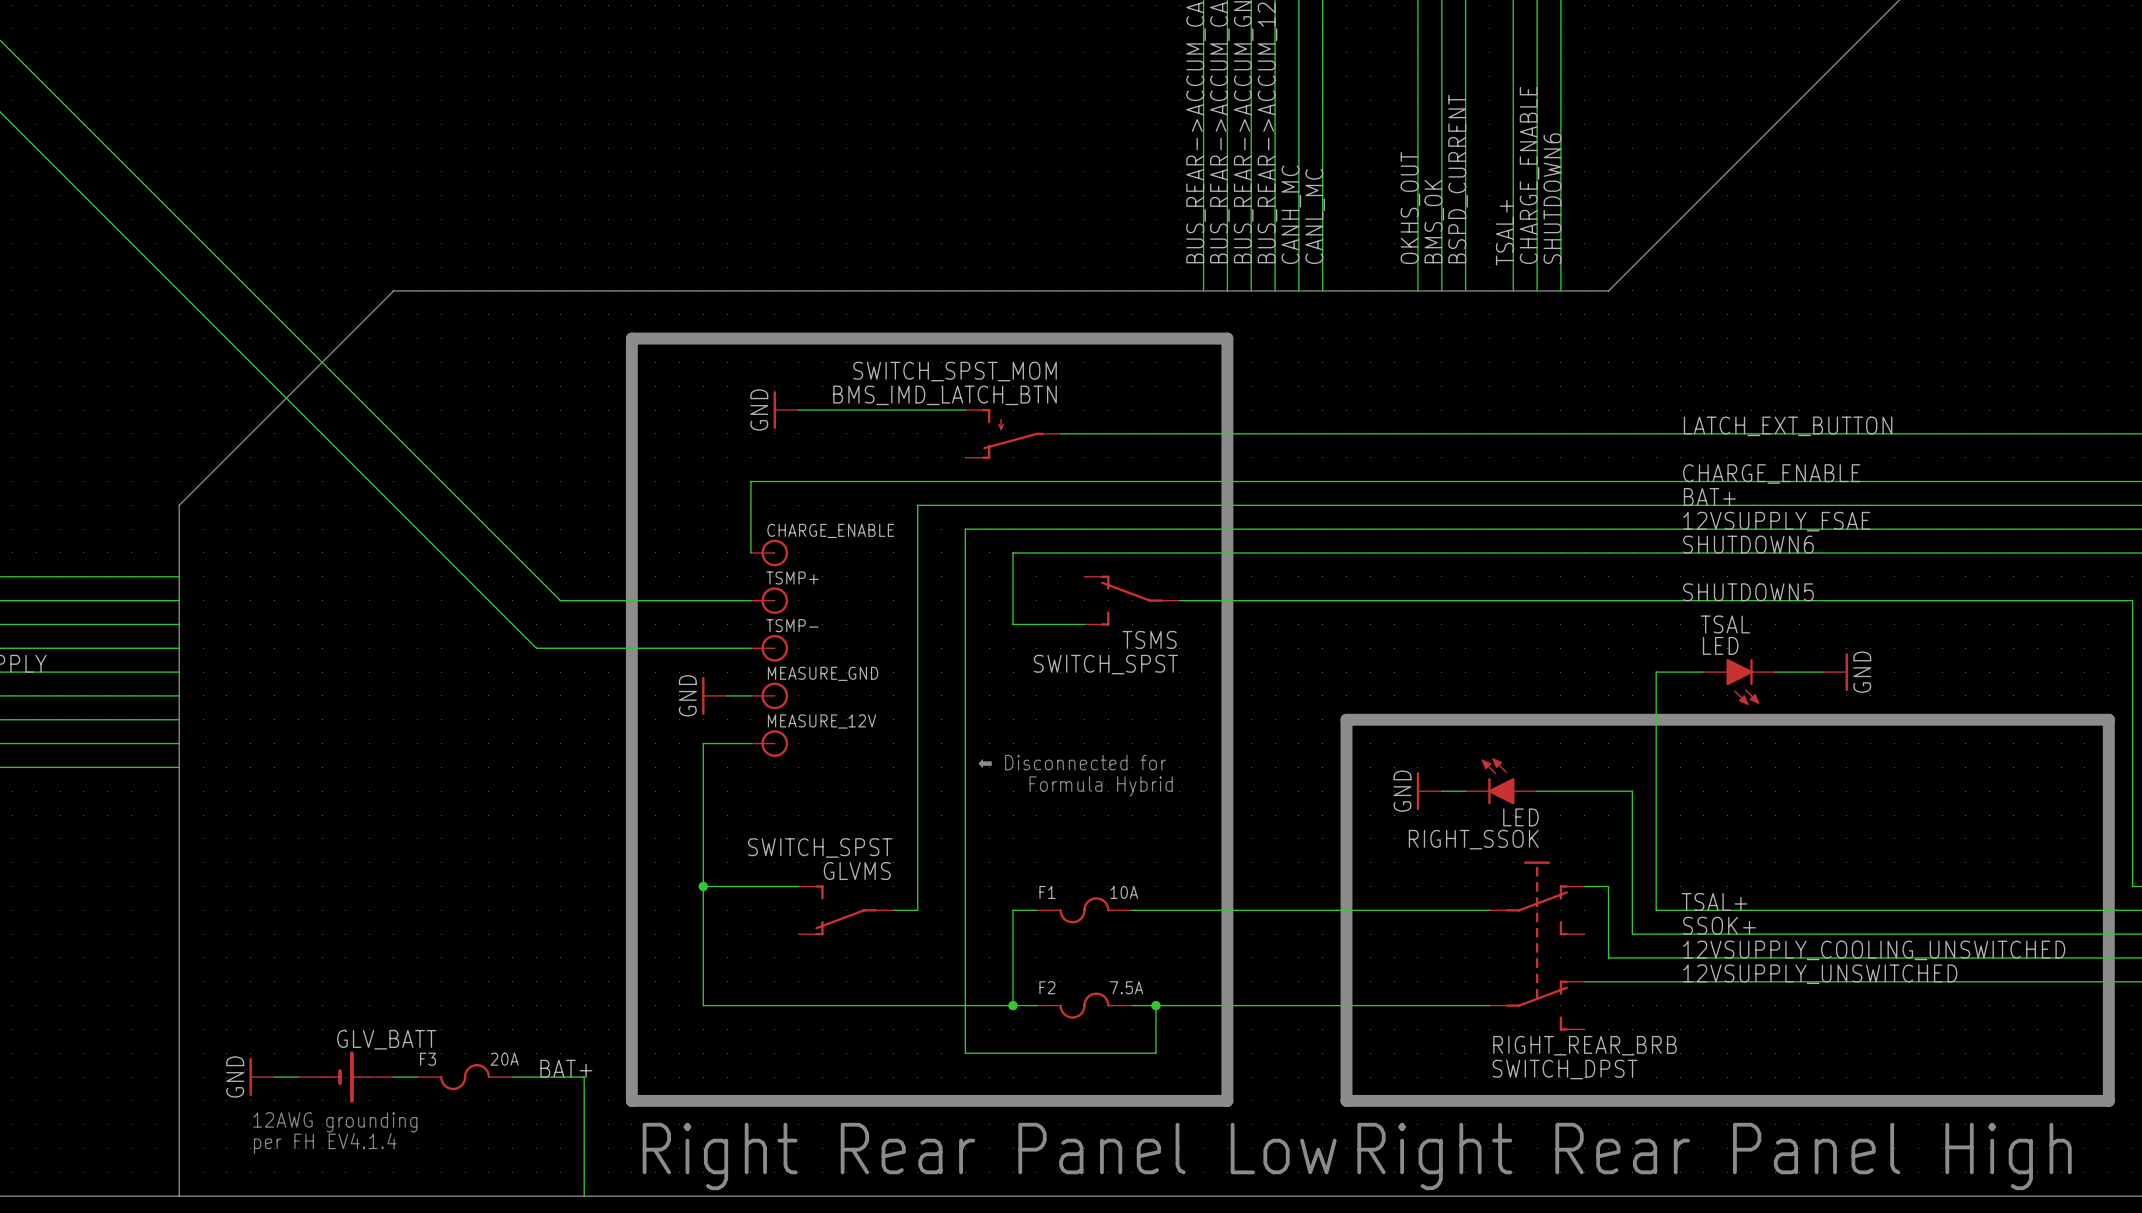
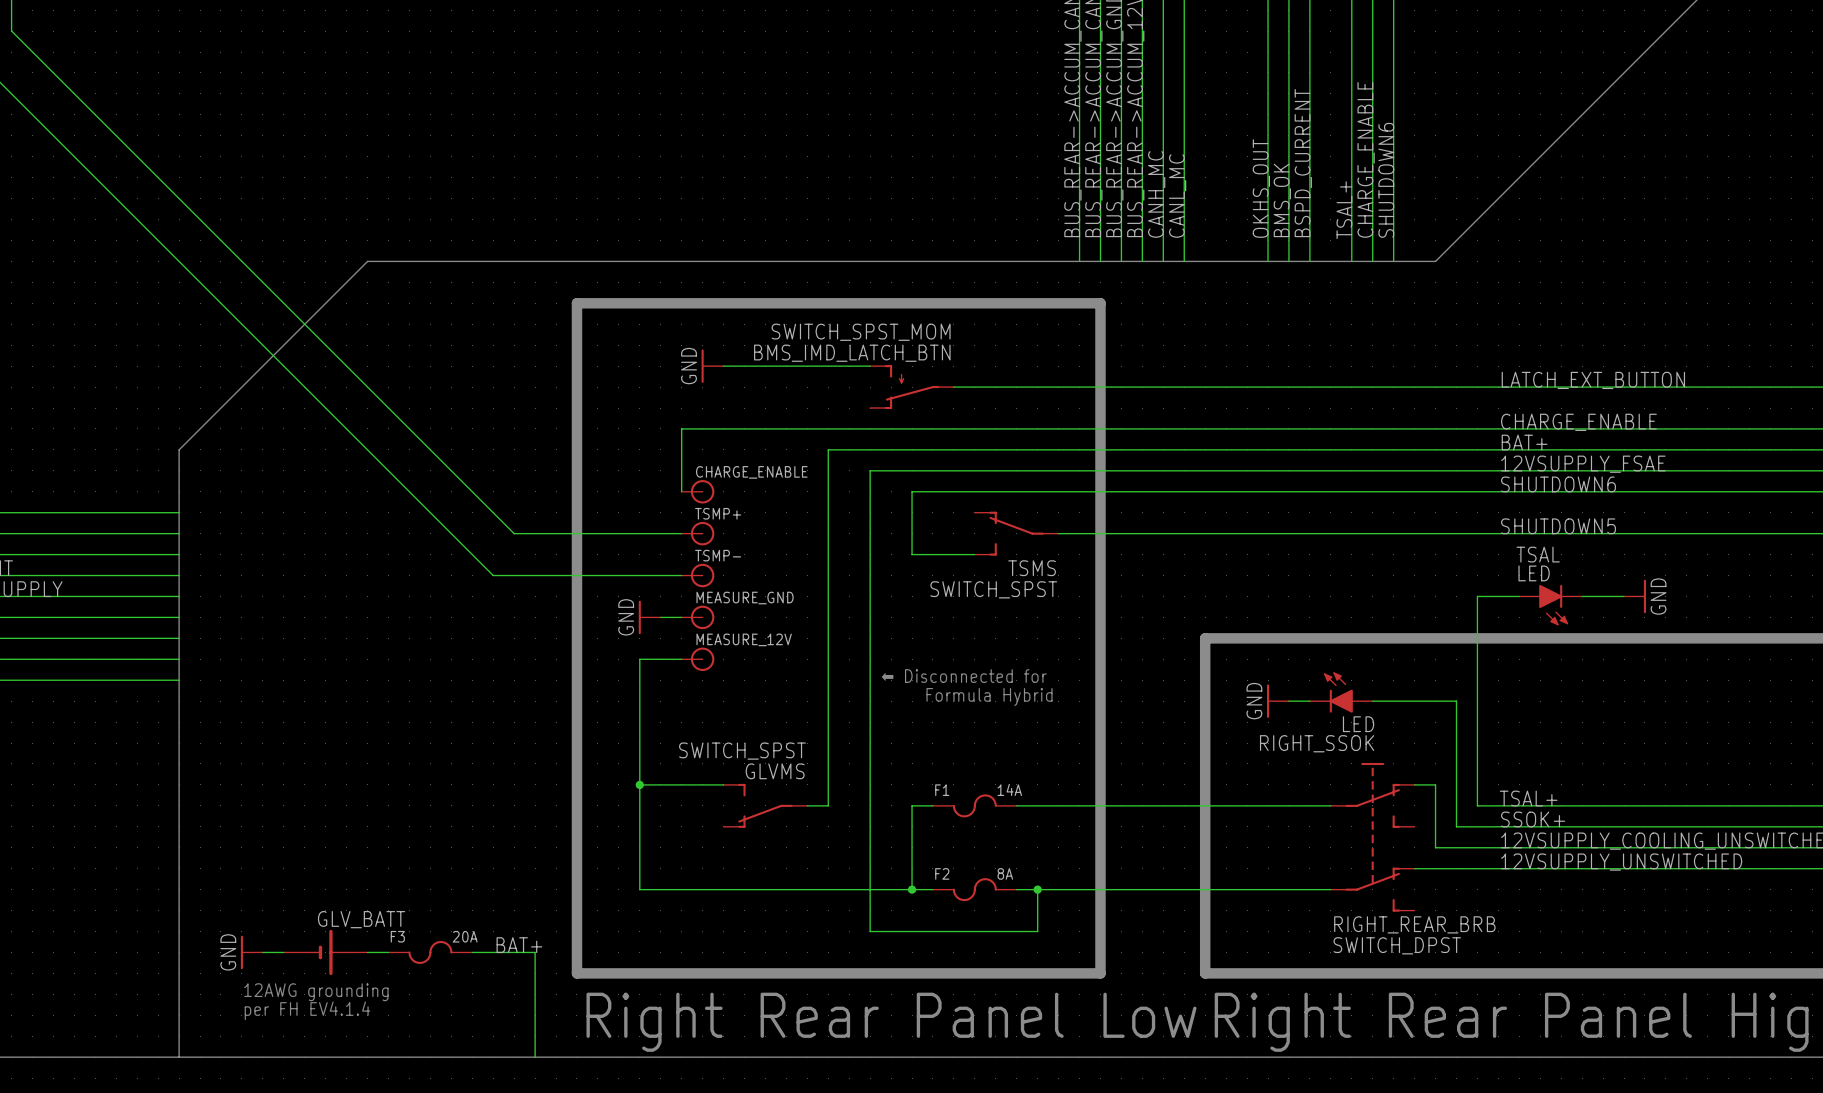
F1 value: 10A (1124, 892) -> 14A (1009, 789)
F2 value: 7.5A (1126, 987) -> 8A (1005, 873)

